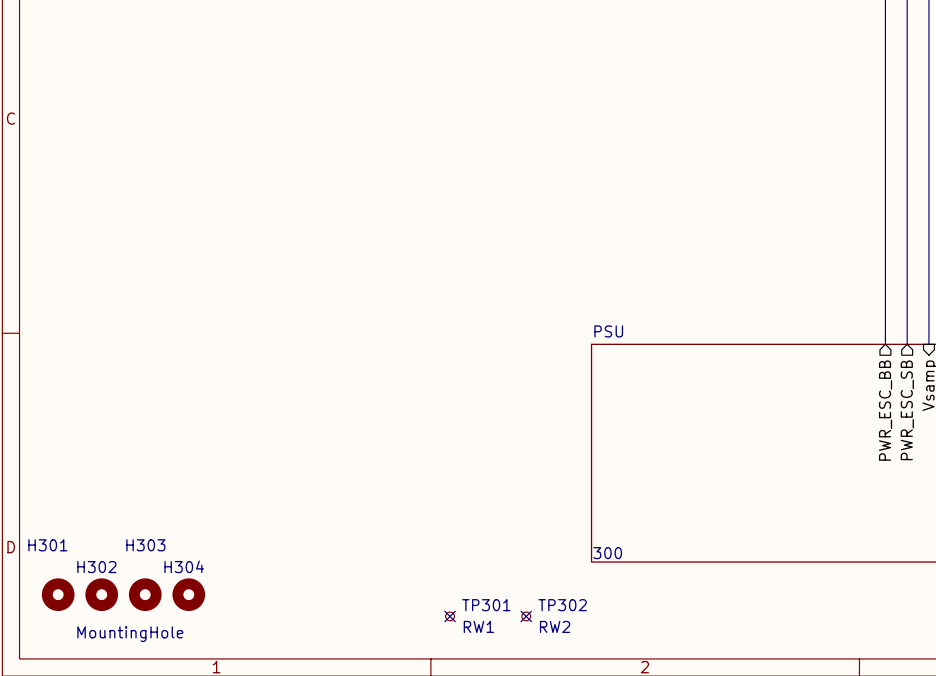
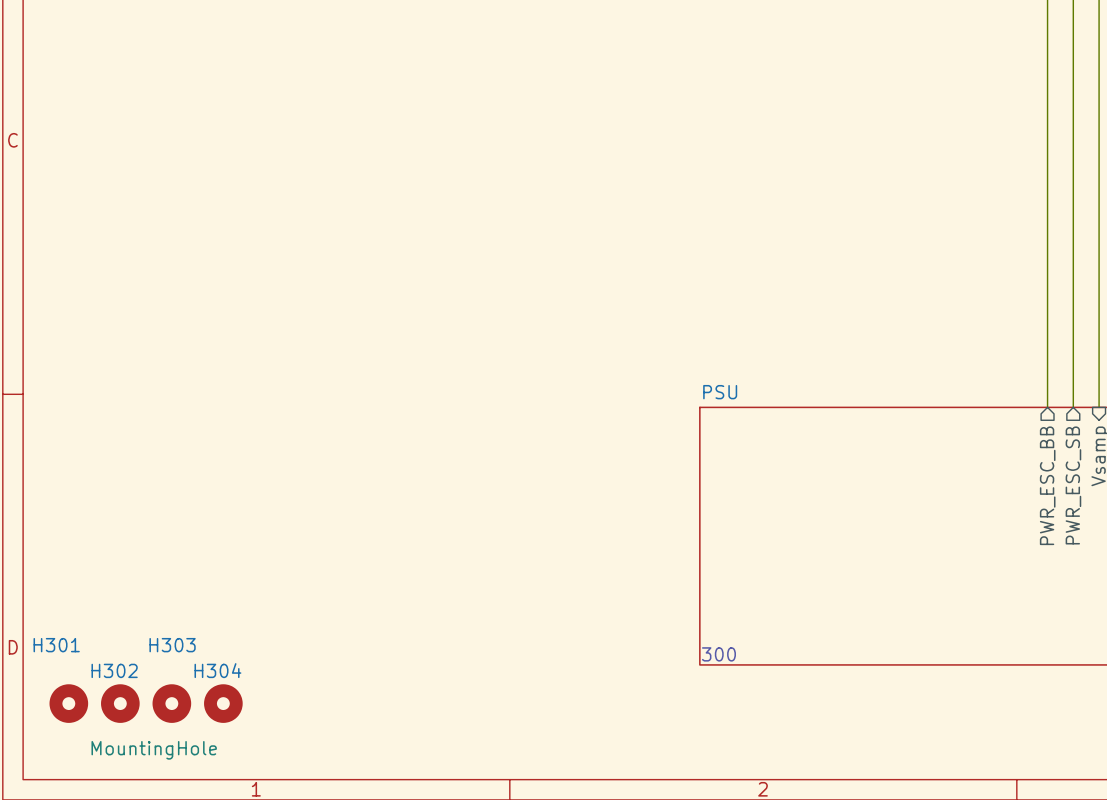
no-connect mark: (450, 616) -> none
TP301: RW1 (450, 616) -> none
no-connect mark: (526, 616) -> none
TP302: RW2 (526, 616) -> none

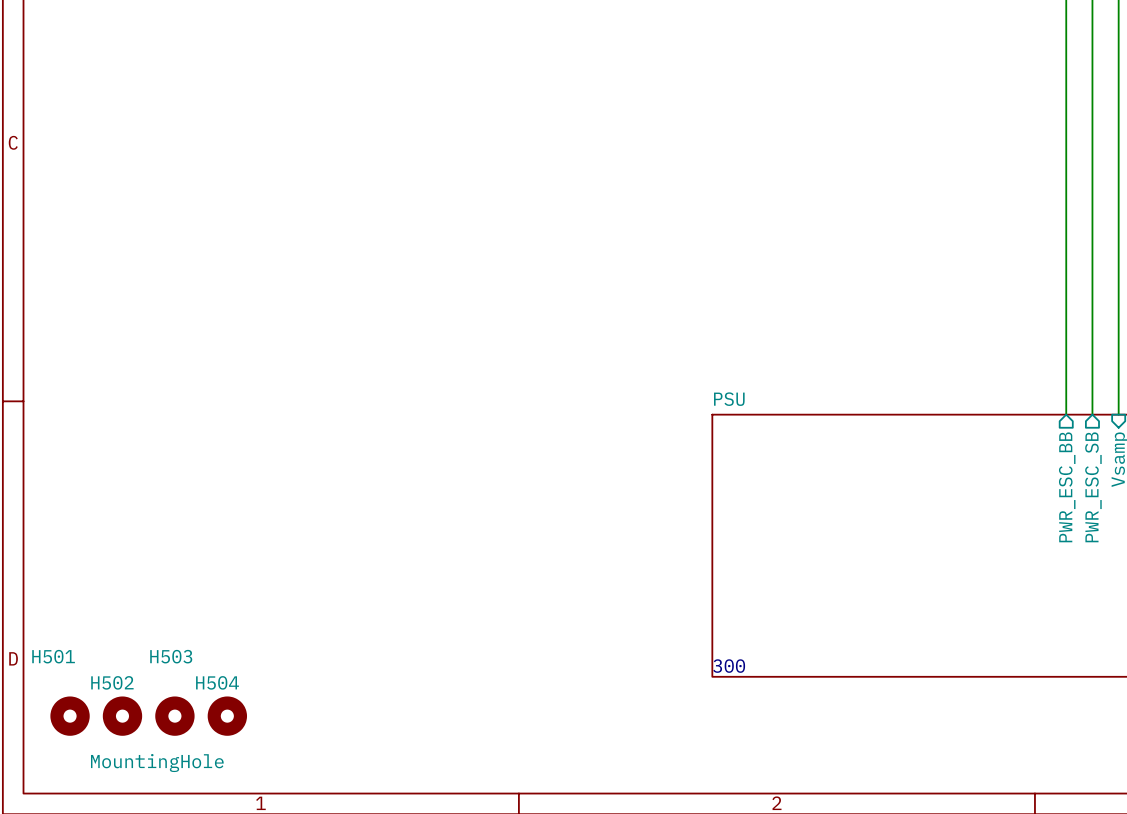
H301 name: H301 (56, 645) -> H501 (53, 656)
H303 name: H303 (172, 645) -> H503 (171, 656)
H302 name: H302 (114, 670) -> H502 (112, 682)
H304 name: H304 (217, 670) -> H504 (217, 682)

